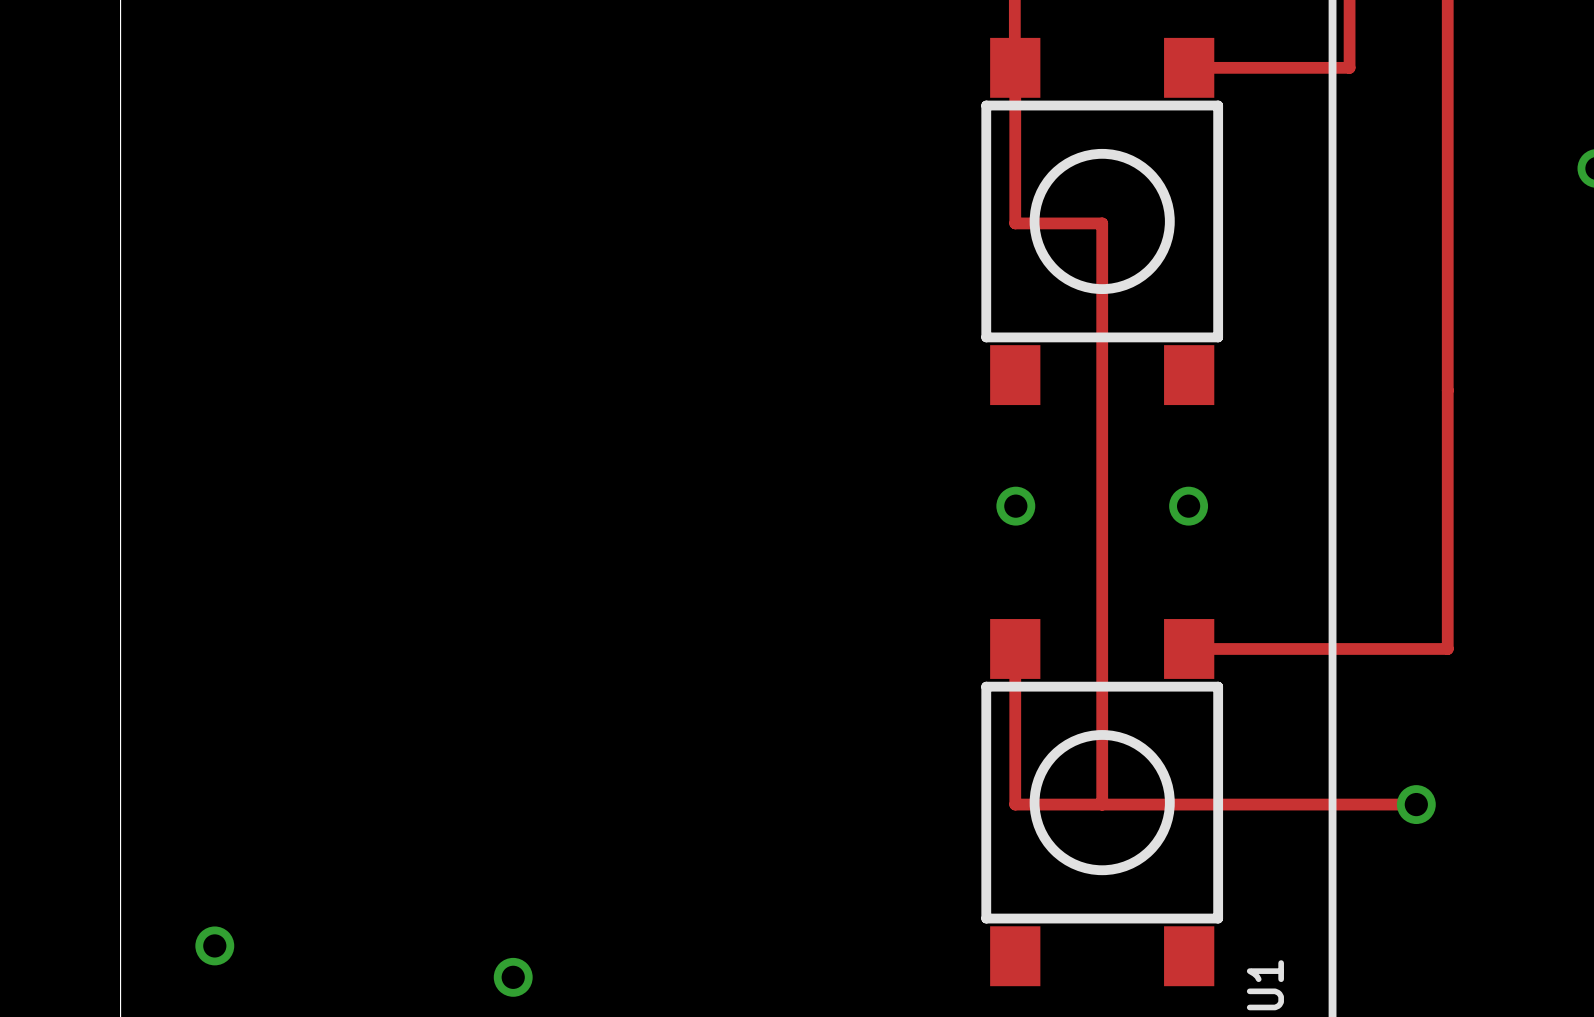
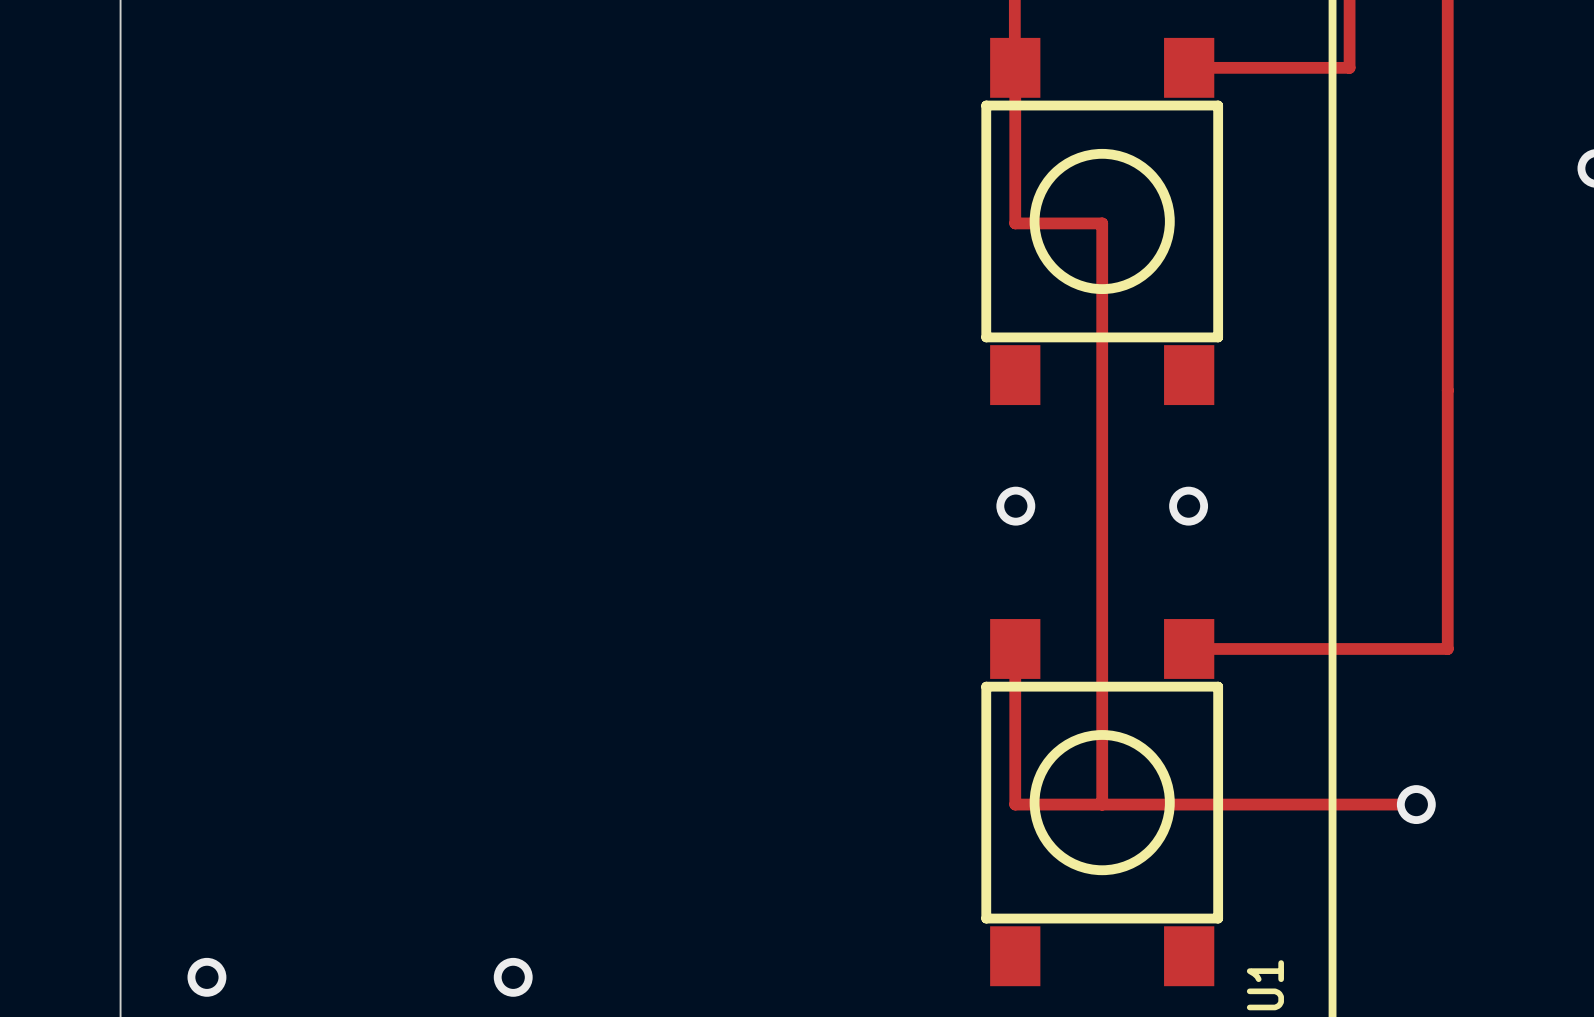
via position: (214, 945) -> (206, 977)

